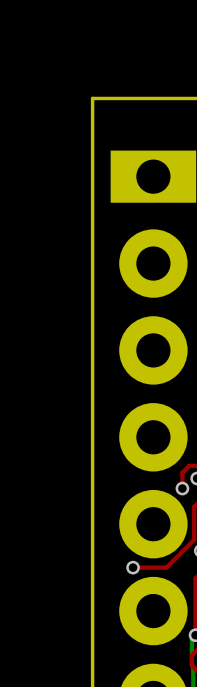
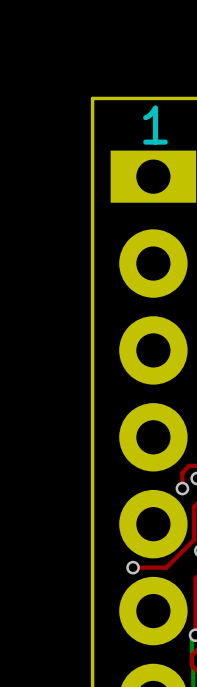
text: none -> 1 (155, 125)

